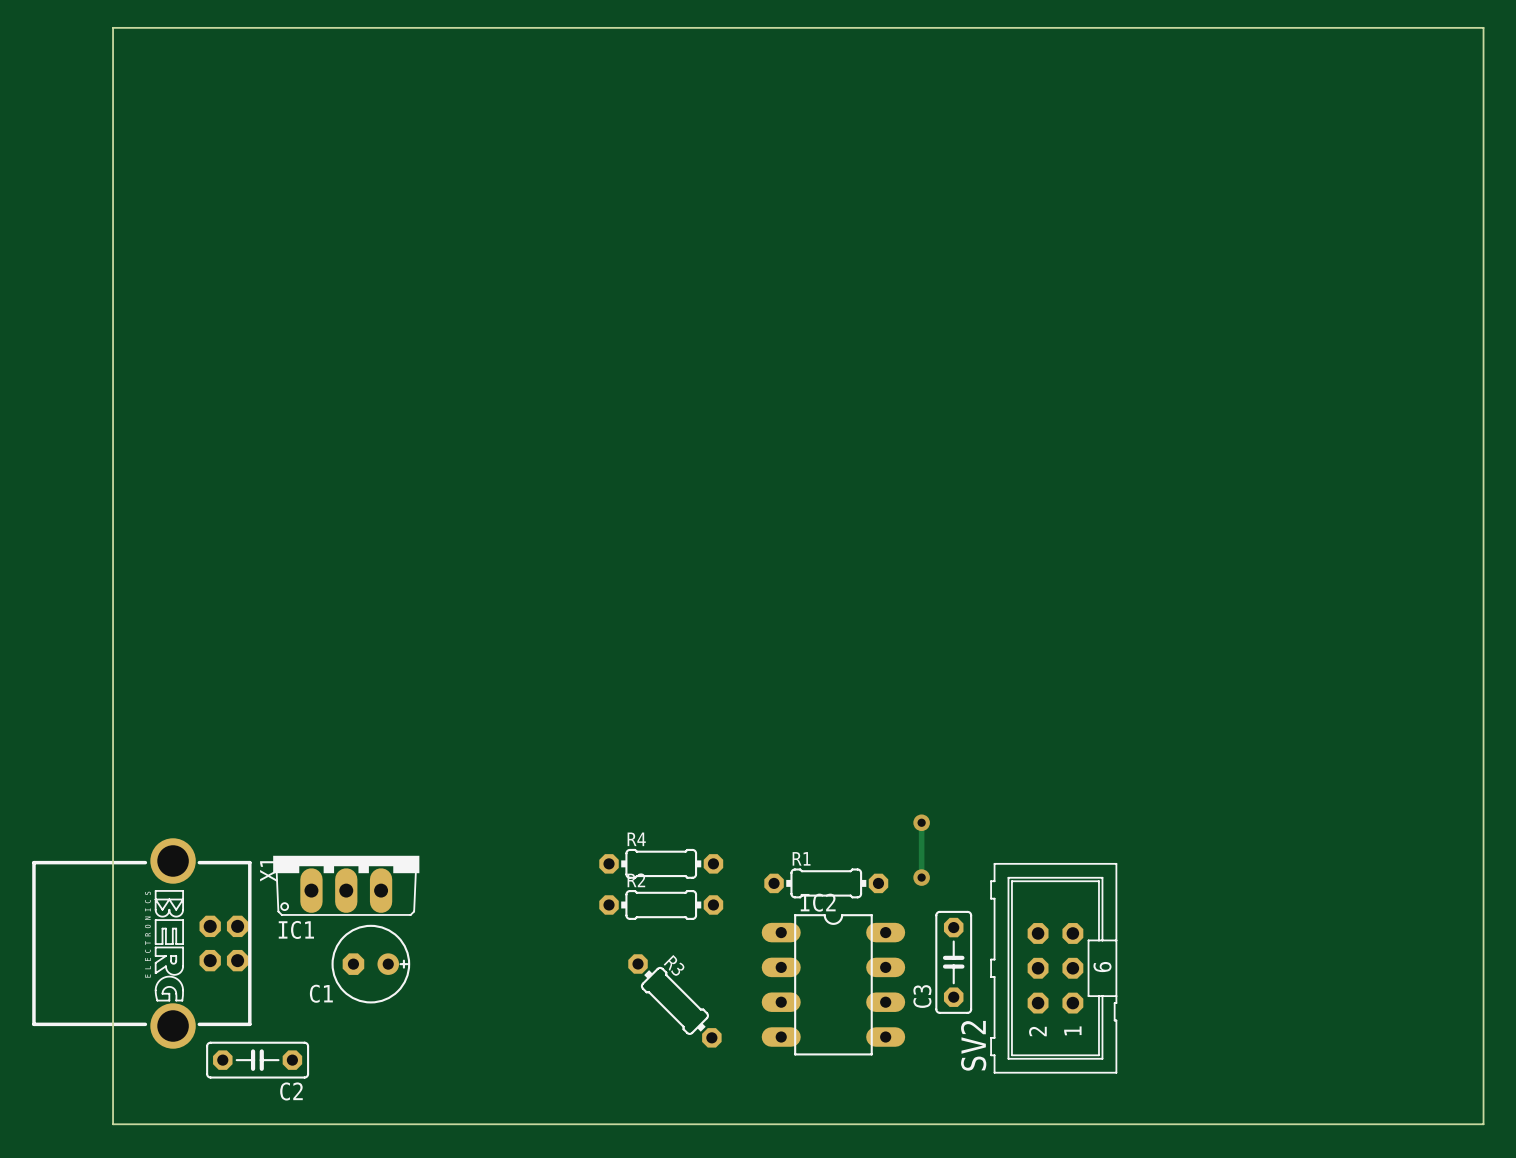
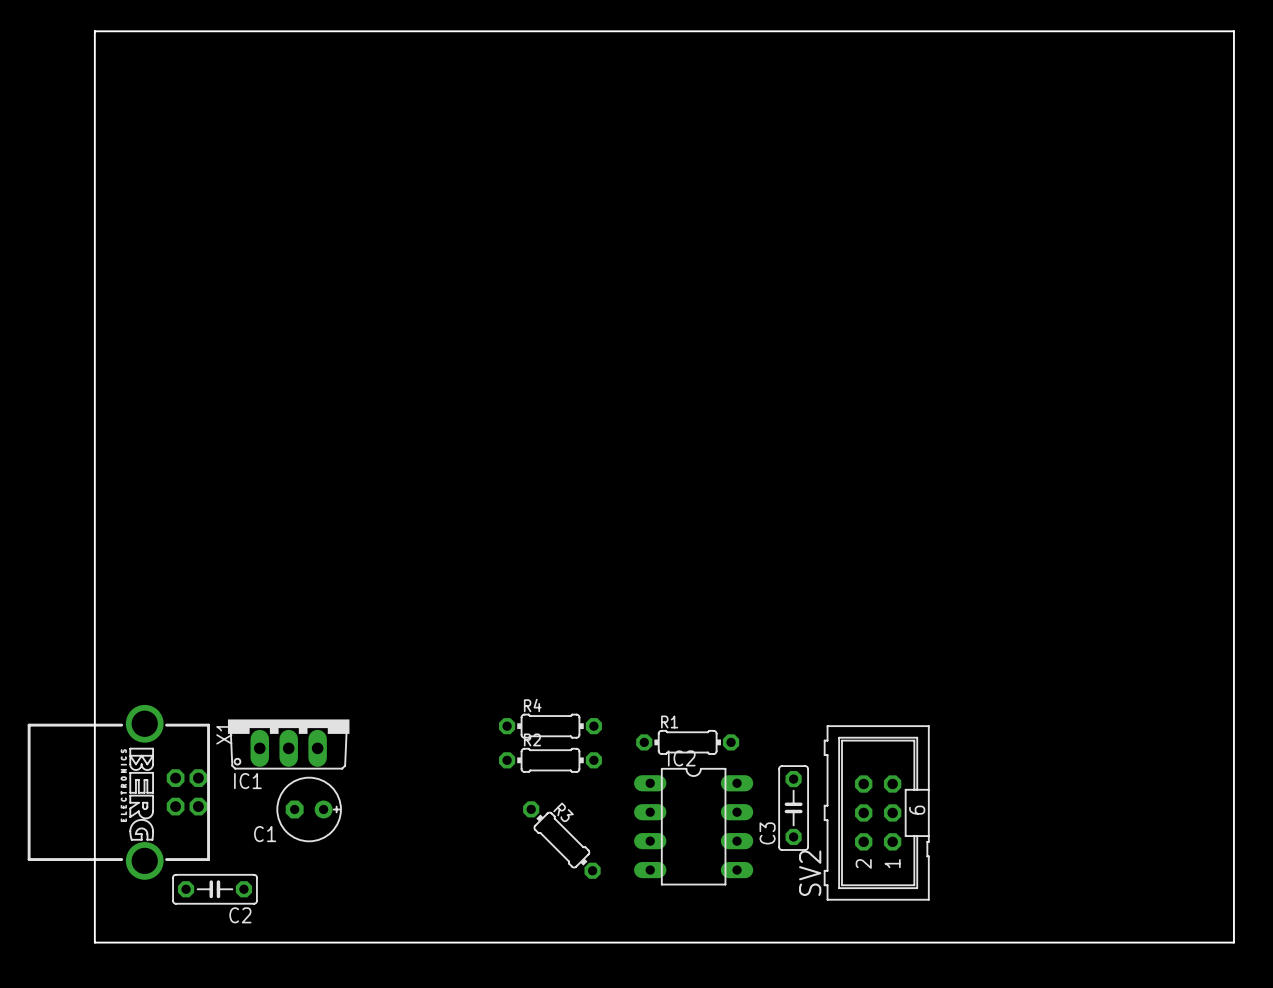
track: (921, 822) (921, 877) -> none
via: (921, 822) -> none
via: (921, 877) -> none

